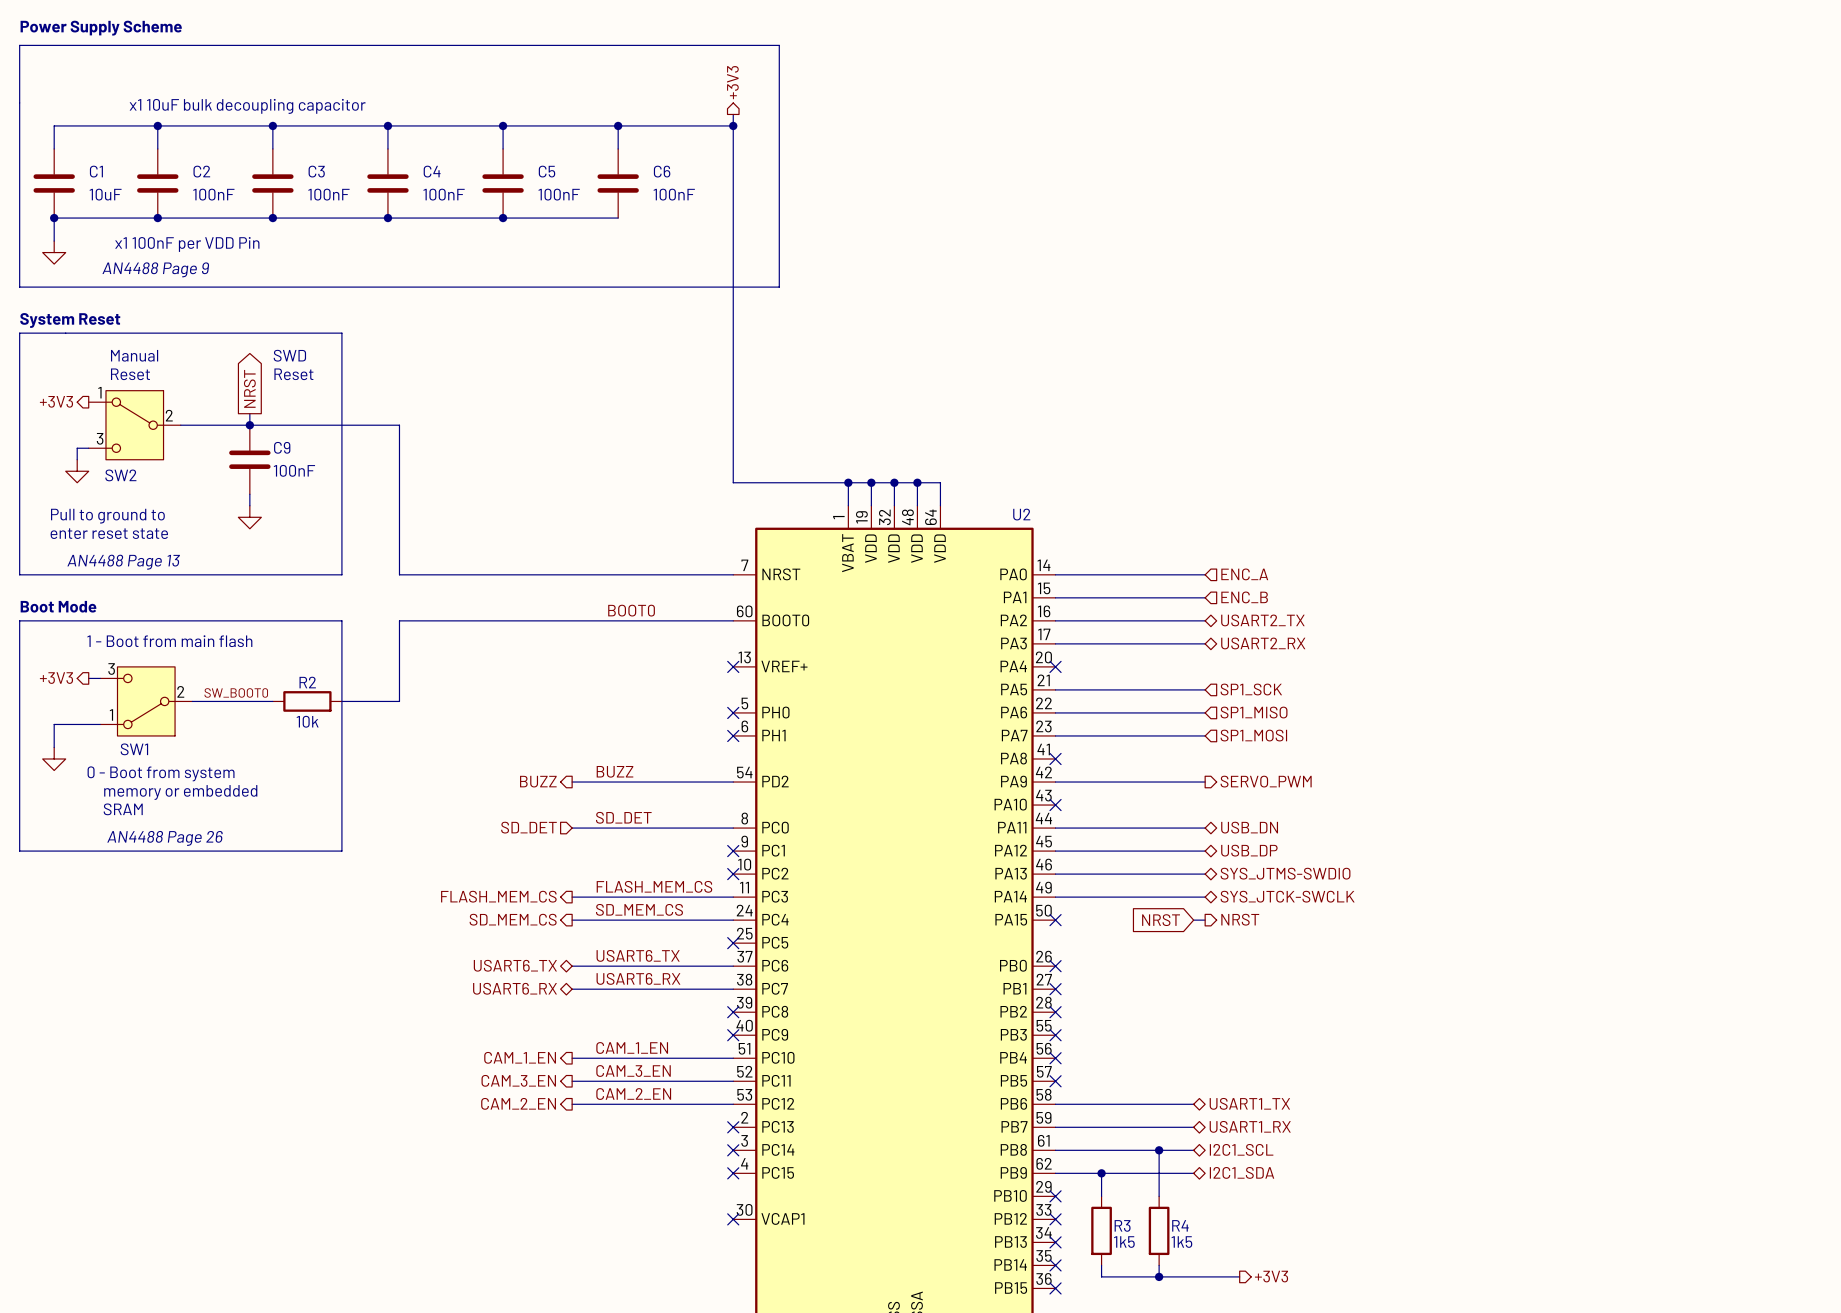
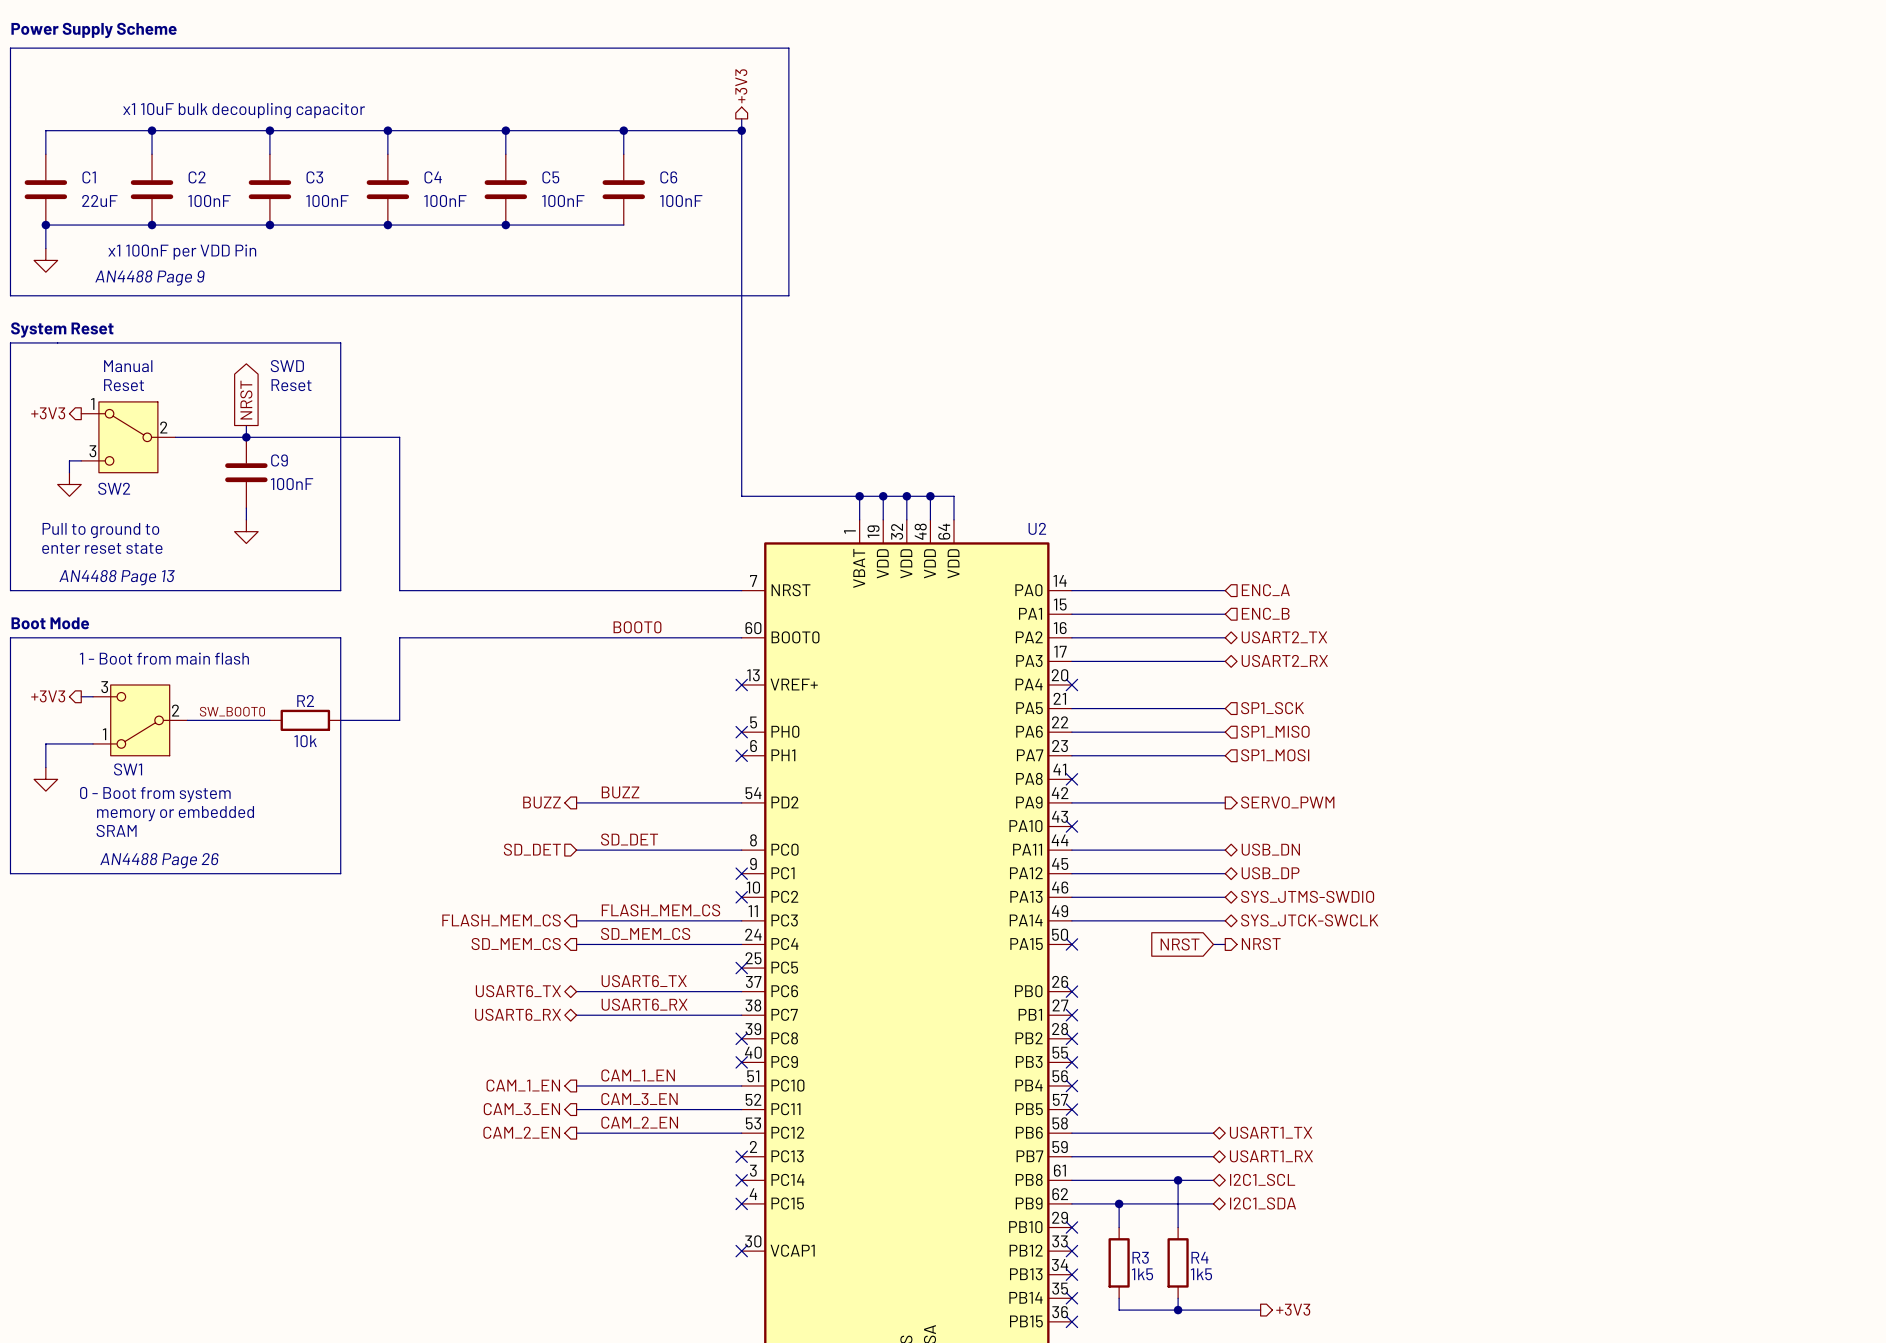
C1 value: 10uF (105, 194) -> 22uF (99, 200)

